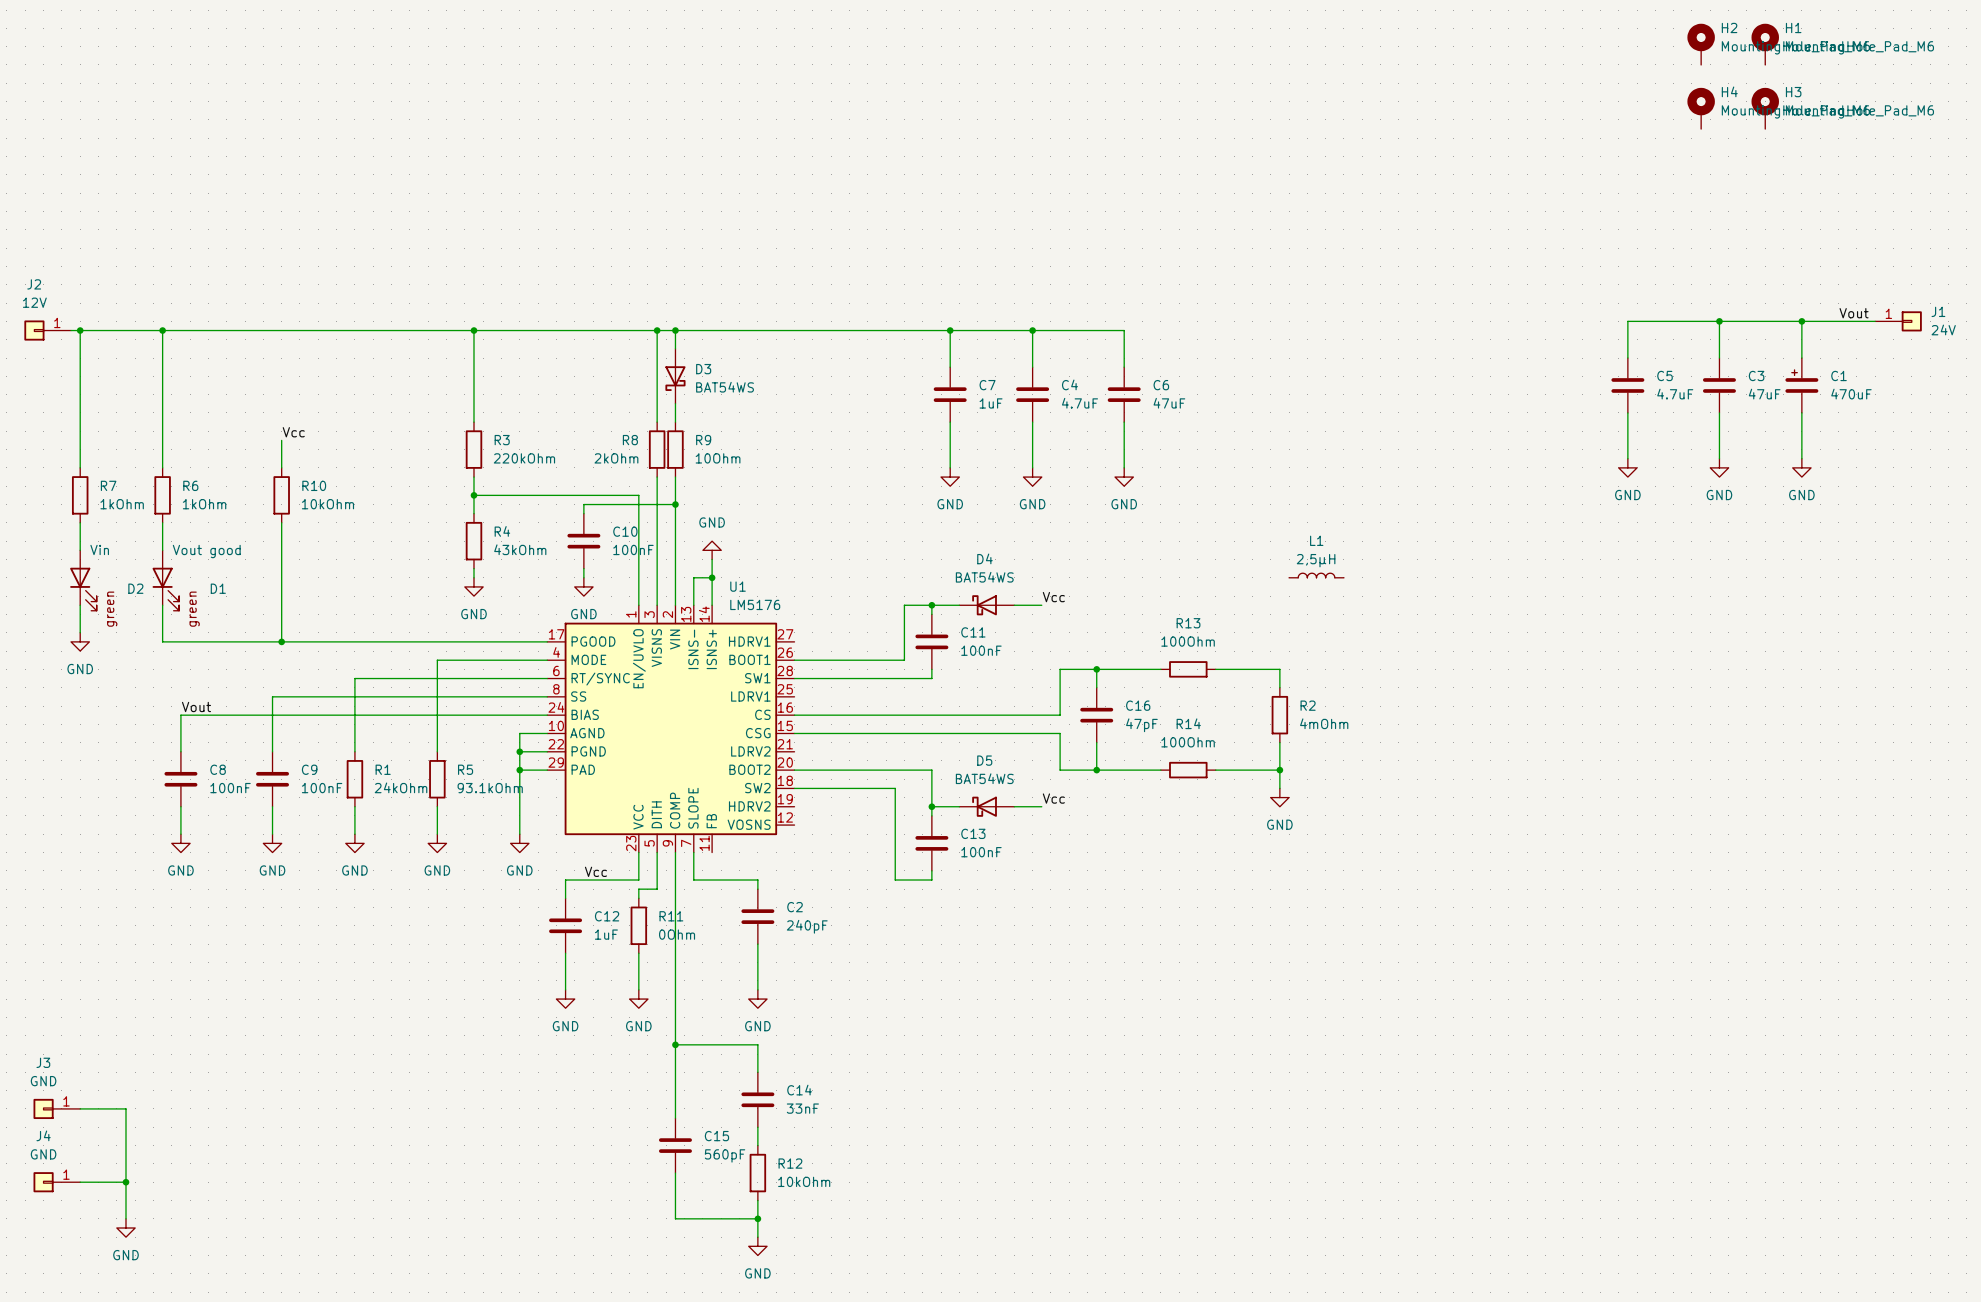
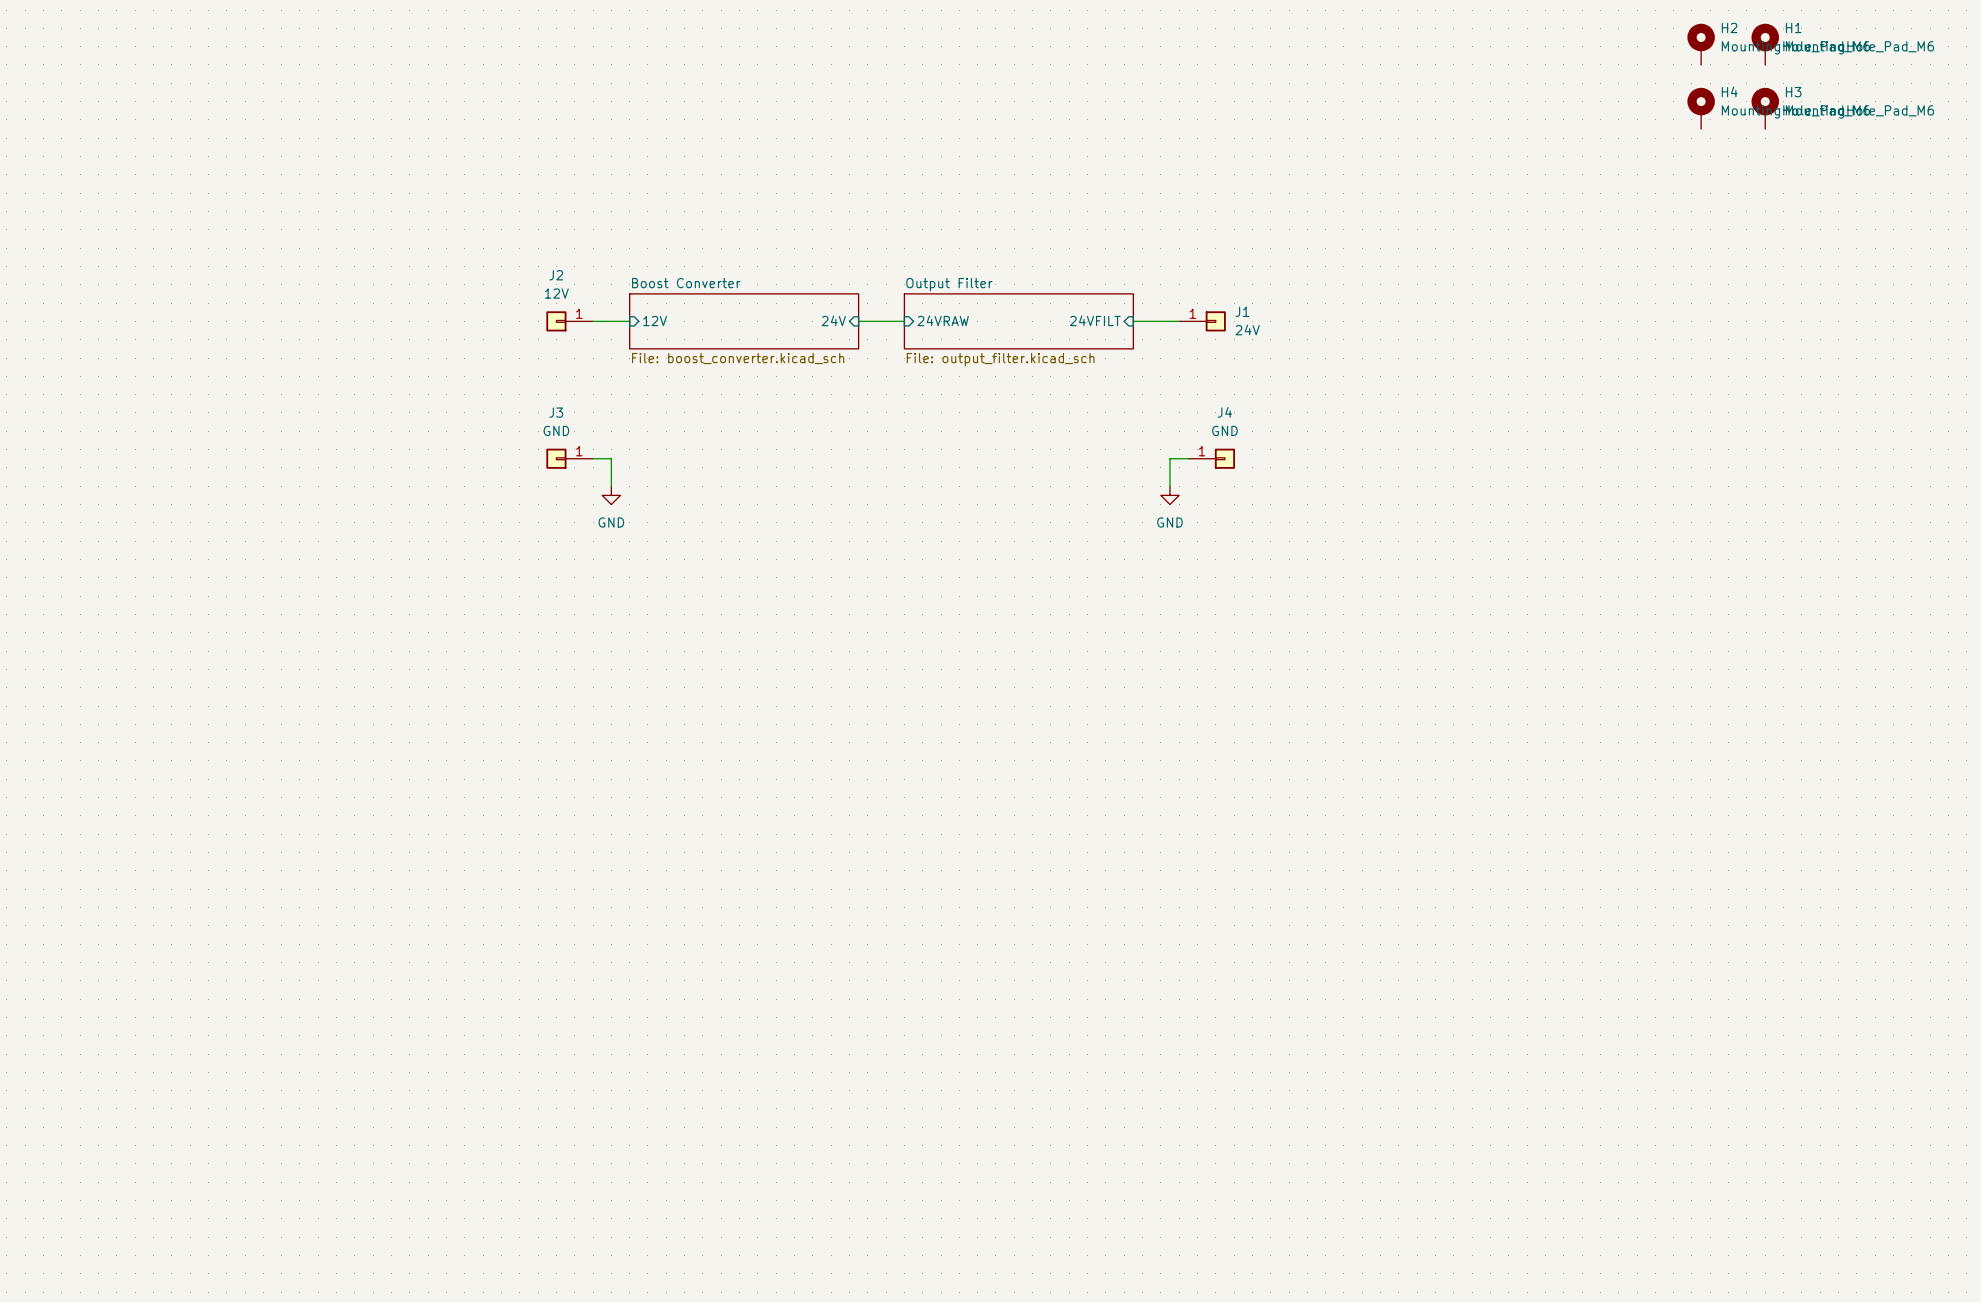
label: Vout (1854, 313) -> none
sheet pin: none -> 24V (833, 320)
sheet pin: none -> 24VRAW (943, 320)
sheet pin: none -> 24VFILT (1095, 320)
wire: none -> (593, 321) (629, 321)
sheet pin: none -> 12V (655, 321)
sheet Boost Converter: none -> File: boost_converter.kicad_sch (744, 321)
wire: none -> (858, 321) (904, 321)
sheet Output Filter: none -> File: output_filter.kicad_sch (1018, 321)
wire: none -> (1133, 321) (1179, 321)
wire: (1719, 321) (1719, 358) -> none
junction: (1719, 321) -> none
wire: (1801, 321) (1801, 358) -> none
junction: (1801, 321) -> none
wire: (1875, 321) (1627, 321) (1627, 358) -> none
J1 position: (1898, 321) -> (1202, 321)
J2 position: (47, 330) -> (569, 321)
wire: (71, 330) (1124, 330) (1124, 367) -> none
wire: (80, 330) (80, 467) -> none
junction: (80, 330) -> none
wire: (162, 330) (162, 467) -> none
junction: (162, 330) -> none
wire: (473, 330) (473, 422) -> none
junction: (473, 330) -> none
wire: (657, 330) (657, 422) -> none
junction: (657, 330) -> none
wire: (675, 330) (675, 348) -> none
junction: (675, 330) -> none
wire: (950, 330) (950, 367) -> none
junction: (950, 330) -> none
wire: (1032, 330) (1032, 367) -> none
junction: (1032, 330) -> none
D3: BAT54WS (675, 376) -> none
C5: 4.7uF (1627, 385) -> none
C3: 47uF (1719, 385) -> none
C1: 470uF (1801, 385) -> none
C7: 1uF (950, 394) -> none
C4: 4.7uF (1032, 394) -> none
C6: 47uF (1124, 394) -> none
wire: (675, 403) (675, 422) -> none
wire: (1627, 412) (1627, 458) -> none
wire: (1719, 412) (1719, 458) -> none
wire: (1801, 412) (1801, 458) -> none
wire: (950, 422) (950, 467) -> none
wire: (1032, 422) (1032, 467) -> none
wire: (1124, 422) (1124, 467) -> none
label: Vcc (293, 432) -> none
wire: (281, 440) (281, 467) -> none
R3: 220kOhm (473, 449) -> none
R8: 2kOhm (657, 449) -> none
R9: 10Ohm (675, 449) -> none
wire: none -> (593, 458) (611, 458) (611, 486)
wire: none -> (1188, 458) (1169, 458) (1169, 486)
power symbol: GND (1627, 467) -> none
power symbol: GND (1719, 467) -> none
power symbol: GND (1801, 467) -> none
wire: (473, 477) (473, 513) -> none
wire: (657, 477) (657, 605) -> none
wire: (675, 477) (675, 605) -> none
power symbol: GND (950, 477) -> none
power symbol: GND (1032, 477) -> none
power symbol position: GND (1124, 477) -> GND (1169, 495)
R7: 1kOhm (80, 495) -> none
R6: 1kOhm (162, 495) -> none
R10: 10kOhm (281, 495) -> none
wire: (473, 495) (638, 495) (638, 605) -> none
junction: (473, 495) -> none
power symbol: none -> GND (611, 495)
wire: (675, 504) (583, 504) (583, 513) -> none
junction: (675, 504) -> none
wire: (80, 522) (80, 550) -> none
wire: (162, 522) (162, 550) -> none
wire: (281, 522) (281, 641) -> none
R4: 43kOhm (473, 541) -> none
C10: 100nF (583, 541) -> none
power symbol: GND (712, 550) -> none
wire: (712, 559) (712, 605) -> none
wire: (473, 568) (473, 577) -> none
wire: (583, 568) (583, 577) -> none
L1: 2,5µH (1316, 575) -> none
wire: (712, 577) (693, 577) (693, 605) -> none
junction: (712, 577) -> none
D2: Vin (83, 580) -> none
D1: Vout good (165, 580) -> none
power symbol: GND (473, 586) -> none
power symbol: GND (583, 586) -> none
label: Vcc (1053, 597) -> none
wire: (80, 605) (80, 632) -> none
wire: (162, 605) (162, 641) (547, 641) -> none
wire: (931, 605) (931, 614) -> none
junction: (931, 605) -> none
wire: (959, 605) (904, 605) (904, 660) (794, 660) -> none
D4: BAT54WS (986, 605) -> none
wire: (1014, 605) (1041, 605) -> none
power symbol: GND (80, 641) -> none
junction: (281, 641) -> none
C11: 100nF (931, 641) -> none
wire: (547, 660) (437, 660) (437, 751) -> none
wire: (931, 669) (931, 678) (794, 678) -> none
wire: (1096, 669) (1096, 687) -> none
junction: (1096, 669) -> none
wire: (1160, 669) (1060, 669) (1060, 715) (794, 715) -> none
R13: 100Ohm (1188, 669) -> none
wire: (1215, 669) (1279, 669) (1279, 687) -> none
wire: (547, 678) (354, 678) (354, 751) -> none
wire: (547, 696) (272, 696) (272, 751) -> none
label: Vout (196, 706) -> none
wire: (547, 715) (180, 715) (180, 751) -> none
C16: 47pF (1096, 715) -> none
R2: 4mOhm (1279, 715) -> none
U1: LM5176 (670, 728) -> none
wire: (547, 733) (519, 733) (519, 834) -> none
wire: (794, 733) (1060, 733) (1060, 770) (1160, 770) -> none
wire: (1096, 742) (1096, 770) -> none
wire: (1279, 742) (1279, 788) -> none
wire: (519, 751) (547, 751) -> none
junction: (519, 751) -> none
wire: (519, 770) (547, 770) -> none
junction: (519, 770) -> none
wire: (794, 770) (931, 770) (931, 815) -> none
junction: (1096, 770) -> none
R14: 100Ohm (1188, 770) -> none
wire: (1215, 770) (1279, 770) -> none
junction: (1279, 770) -> none
C8: 100nF (180, 779) -> none
C9: 100nF (272, 779) -> none
R1: 24kOhm (354, 779) -> none
R5: 93.1kOhm (437, 779) -> none
wire: (794, 788) (895, 788) (895, 880) (931, 880) (931, 870) -> none
power symbol: GND (1279, 797) -> none
label: Vcc (1053, 798) -> none
wire: (180, 806) (180, 834) -> none
wire: (272, 806) (272, 834) -> none
wire: (354, 806) (354, 834) -> none
wire: (437, 806) (437, 834) -> none
wire: (931, 806) (959, 806) -> none
junction: (931, 806) -> none
D5: BAT54WS (986, 806) -> none
wire: (1014, 806) (1041, 806) -> none
power symbol: GND (180, 843) -> none
power symbol: GND (272, 843) -> none
power symbol: GND (354, 843) -> none
power symbol: GND (437, 843) -> none
power symbol: GND (519, 843) -> none
C13: 100nF (931, 843) -> none
wire: (638, 852) (638, 880) (565, 880) (565, 898) -> none
wire: (657, 852) (657, 889) (638, 889) (638, 898) -> none
wire: (675, 852) (675, 1118) -> none
wire: (693, 852) (693, 880) (757, 880) (757, 889) -> none
label: Vcc (595, 871) -> none
C2: 240pF (757, 916) -> none
C12: 1uF (565, 925) -> none
R11: 0Ohm (638, 925) -> none
wire: (757, 944) (757, 989) -> none
wire: (565, 953) (565, 989) -> none
wire: (638, 953) (638, 989) -> none
power symbol: GND (565, 999) -> none
power symbol: GND (638, 999) -> none
power symbol: GND (757, 999) -> none
wire: (675, 1044) (757, 1044) (757, 1072) -> none
junction: (675, 1044) -> none
C14: 33nF (757, 1099) -> none
J3 position: (56, 1108) -> (569, 458)
wire: (80, 1108) (125, 1108) (125, 1218) -> none
wire: (757, 1127) (757, 1145) -> none
J4 name position: J4 (43, 1135) -> J4 (1224, 412)
C15: 560pF (675, 1145) -> none
J4 value position: GND (43, 1154) -> GND (1224, 430)
wire: (675, 1173) (675, 1218) (757, 1218) -> none
R12: 10kOhm (757, 1173) -> none
J4 rotation: 0° (43, 1182) -> 180° (1224, 458)
J4 position: (56, 1182) -> (1211, 458)
wire: (80, 1182) (125, 1182) -> none
junction: (125, 1182) -> none
wire: (757, 1200) (757, 1237) -> none
junction: (757, 1218) -> none
power symbol: GND (125, 1228) -> none
power symbol: GND (757, 1246) -> none

